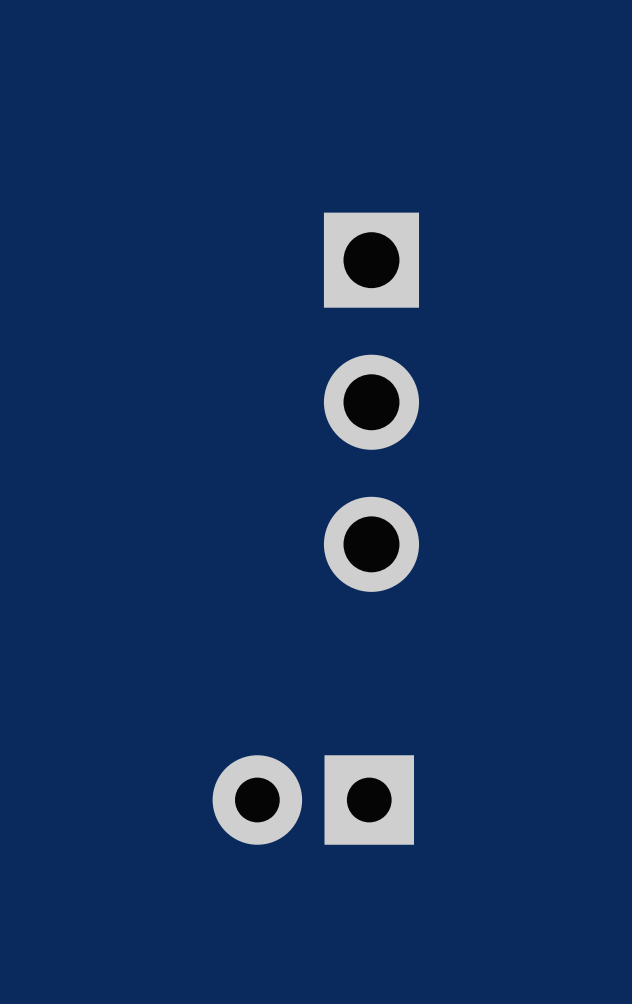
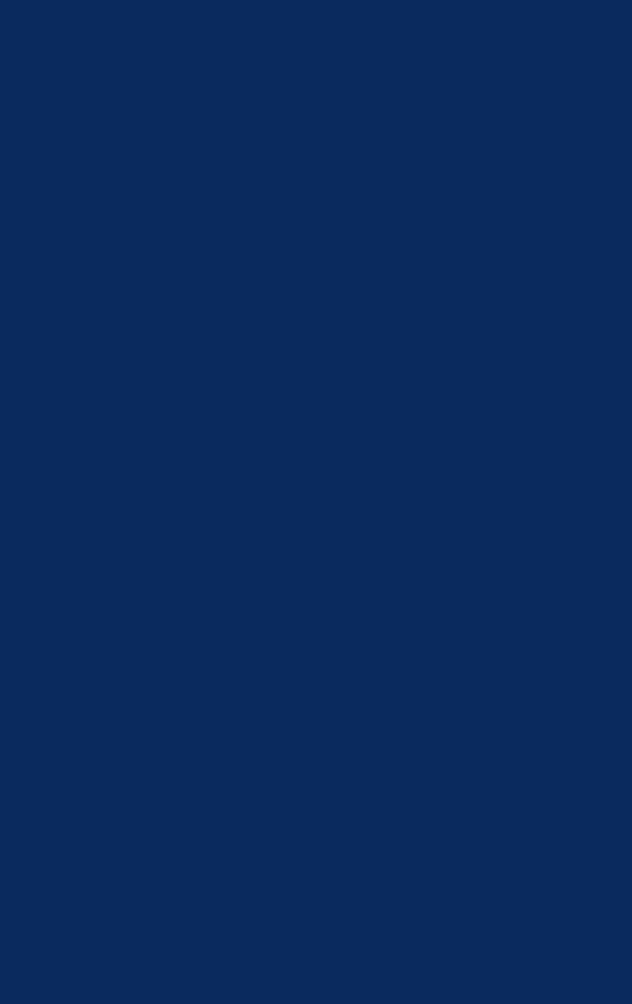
part: (371, 402) -> none
part: (313, 800) -> none

